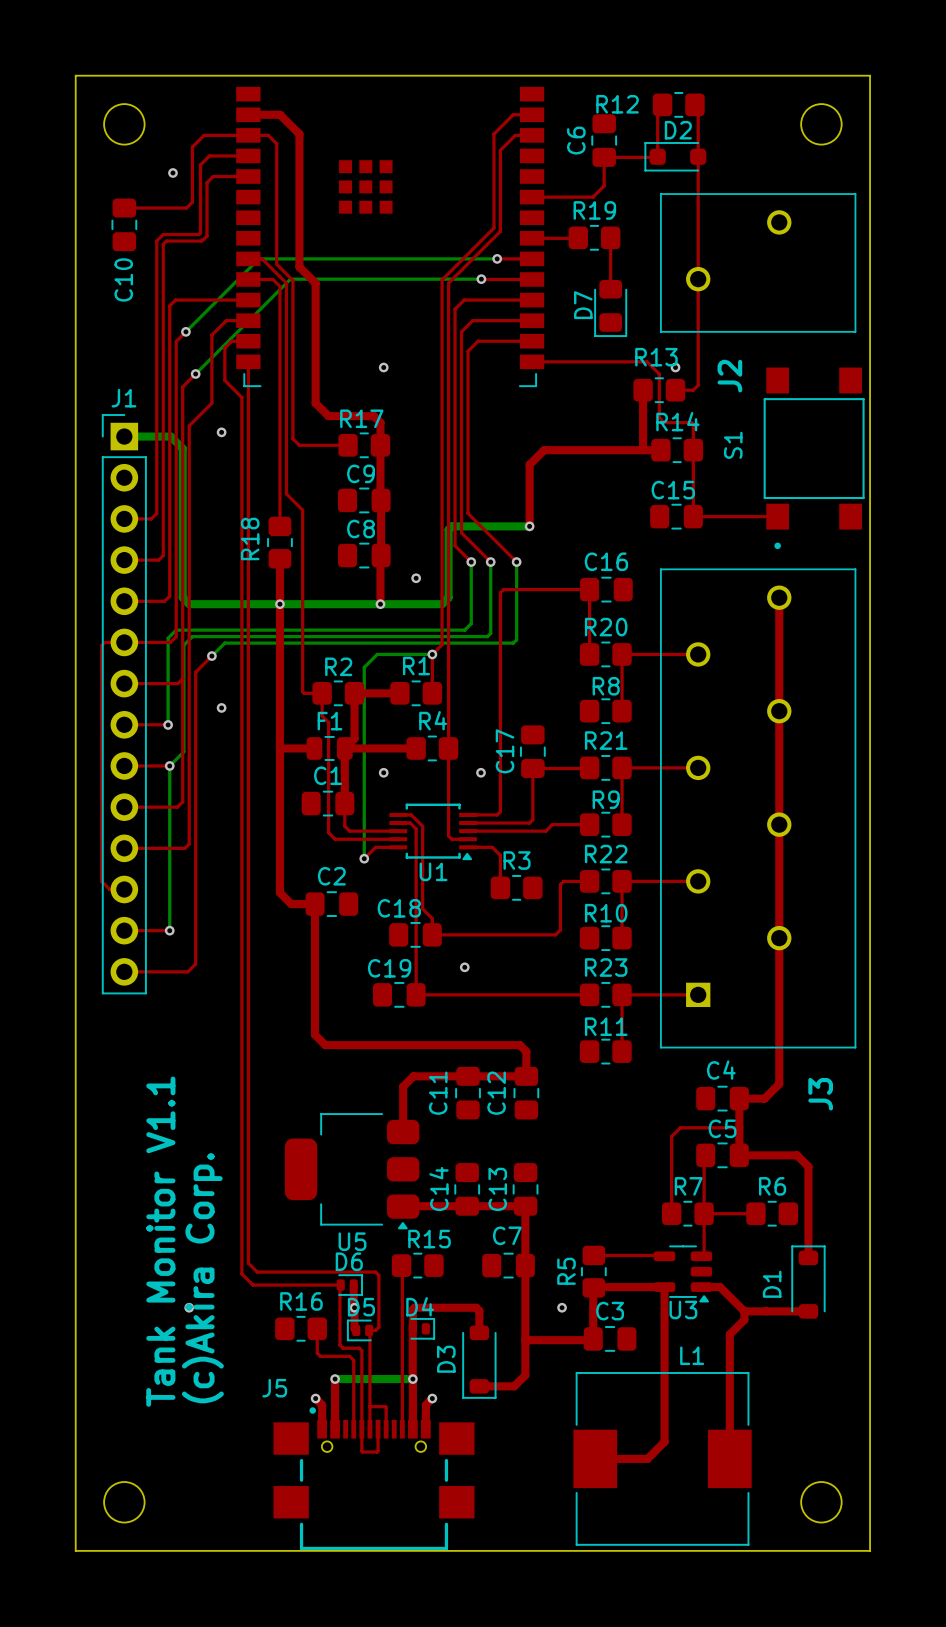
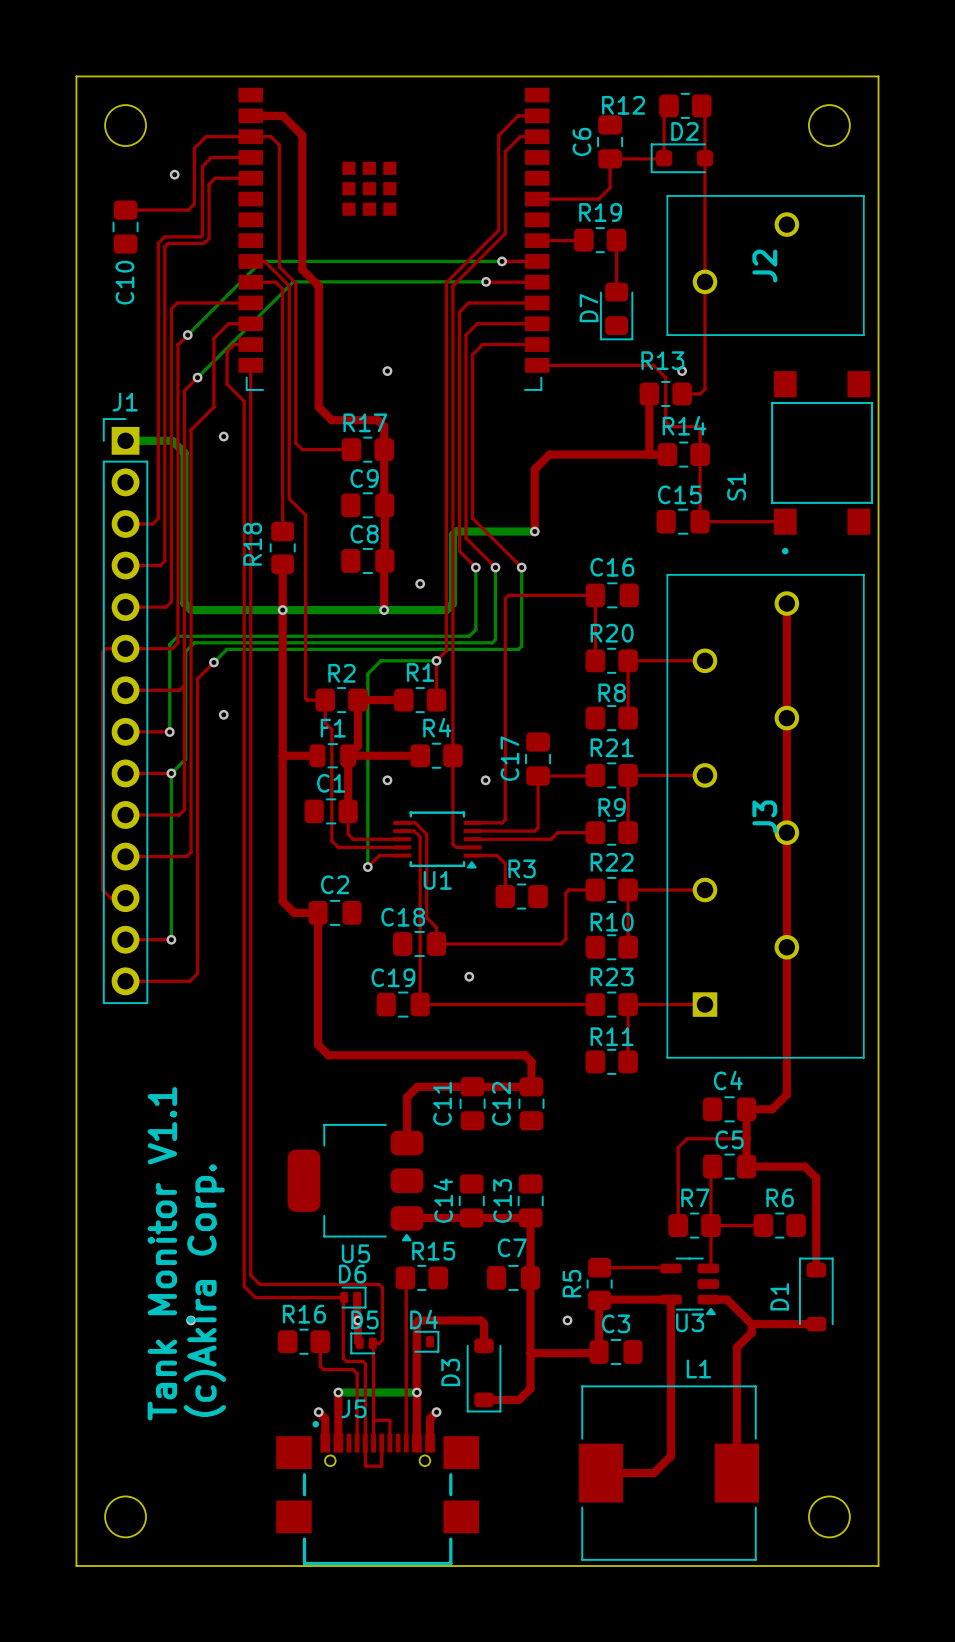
J2 name position: J2 (729, 376) -> J2 (764, 266)
S1 name position: S1 (733, 445) -> S1 (736, 486)
J3 name position: J3 (820, 1094) -> J3 (764, 816)
J5 name position: J5 (274, 1388) -> J5 (353, 1408)

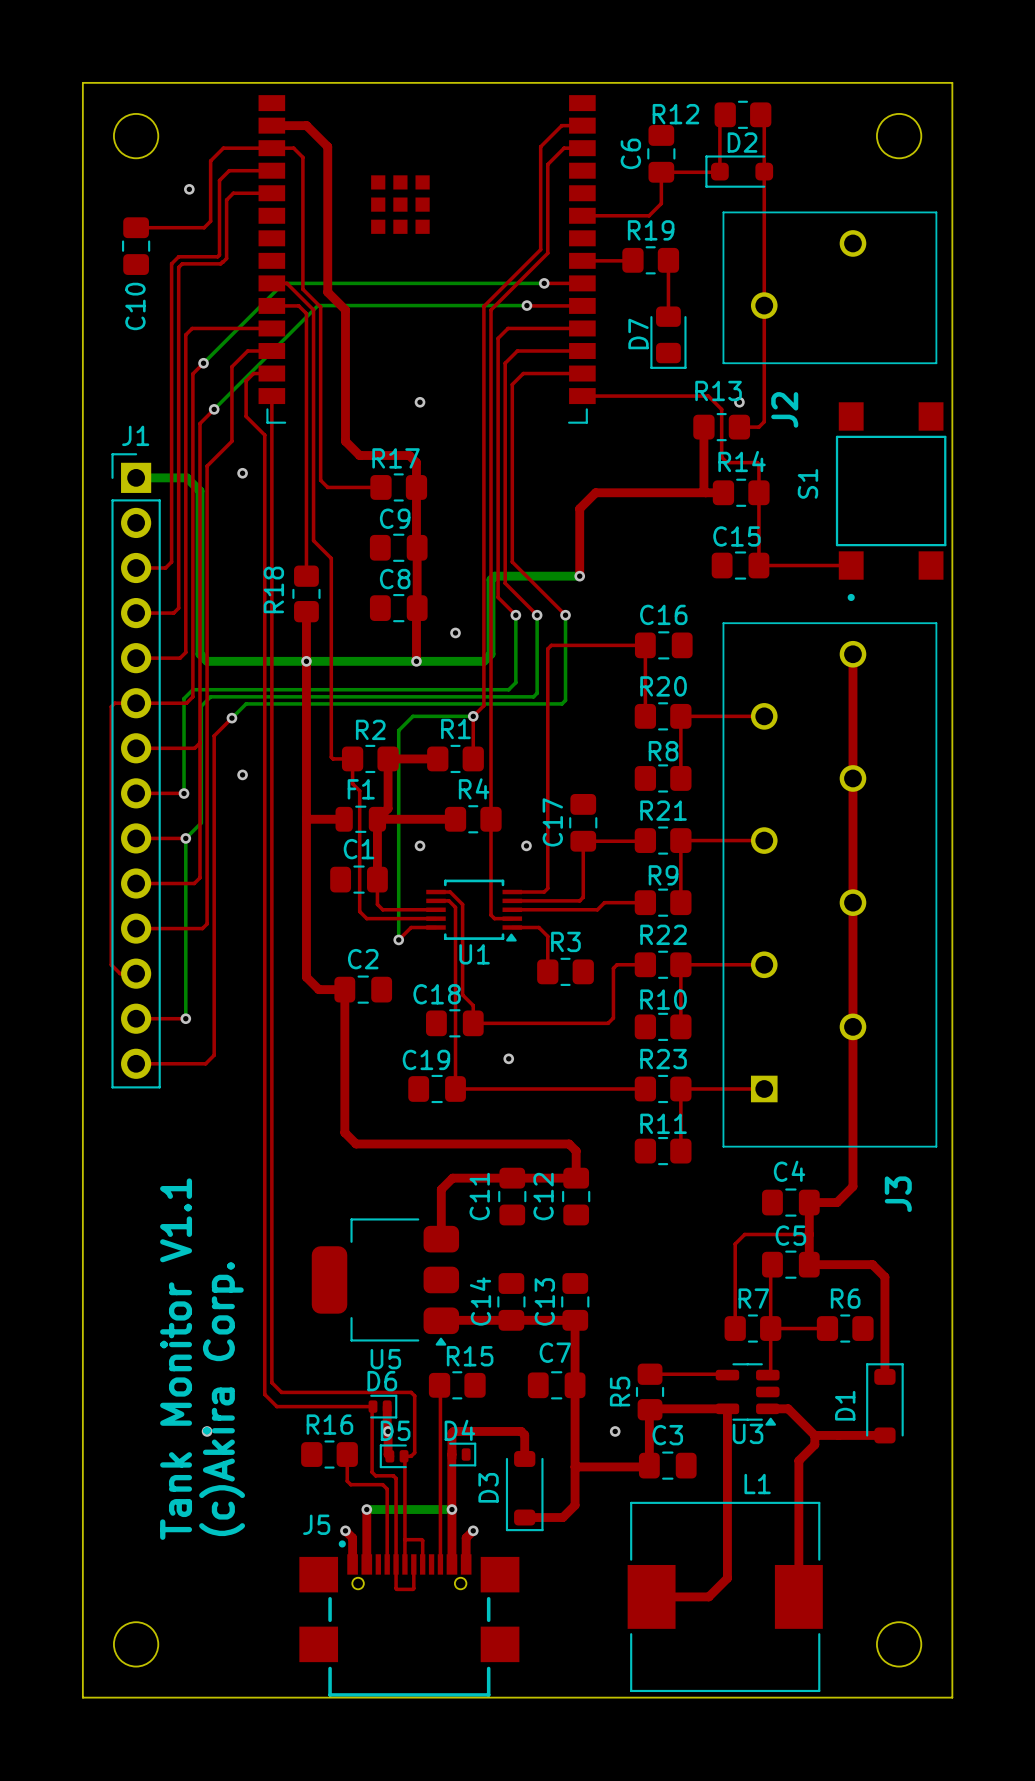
J2 name position: J2 (764, 266) -> J2 (784, 409)
S1 name position: S1 (736, 486) -> S1 (807, 483)
J3 name position: J3 (764, 816) -> J3 (898, 1194)
J5 name position: J5 (353, 1408) -> J5 (316, 1524)

